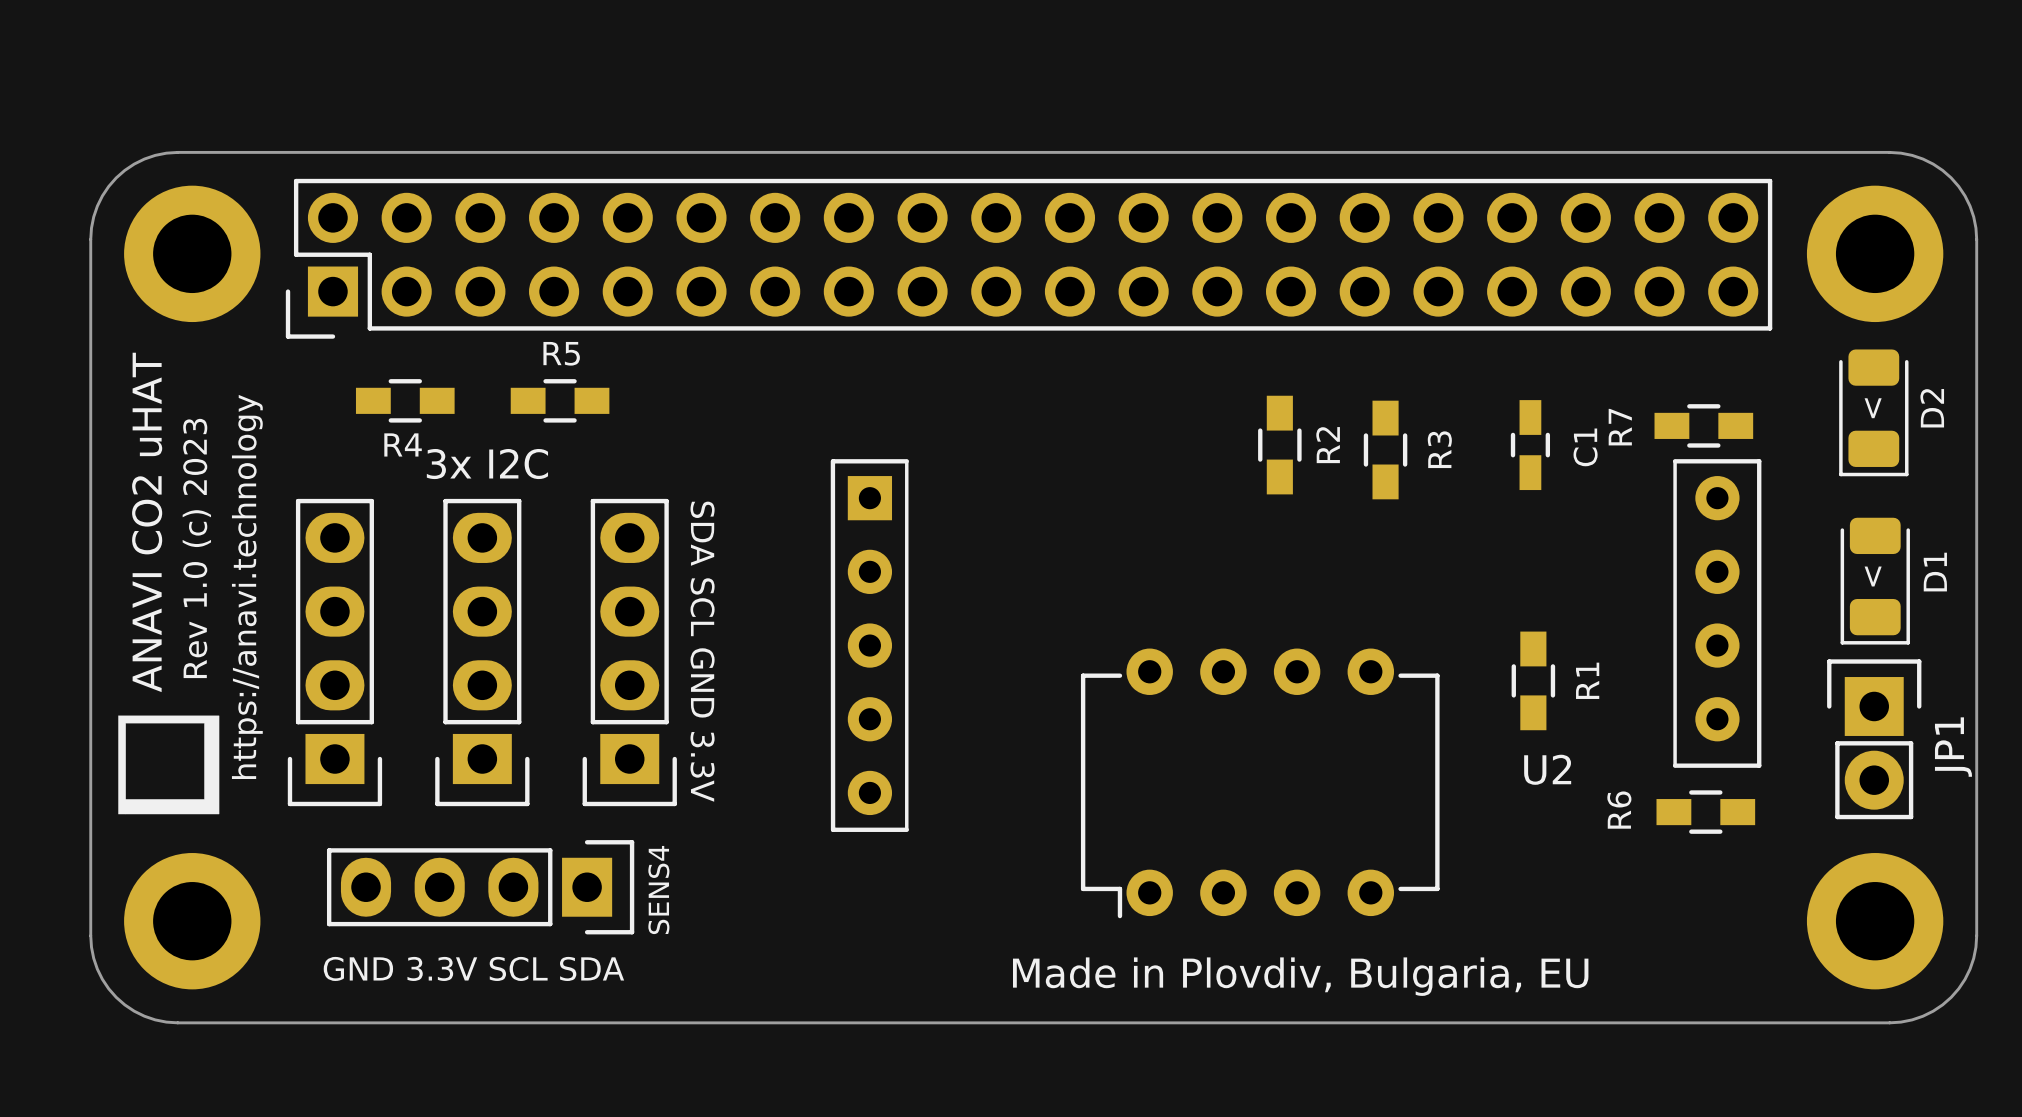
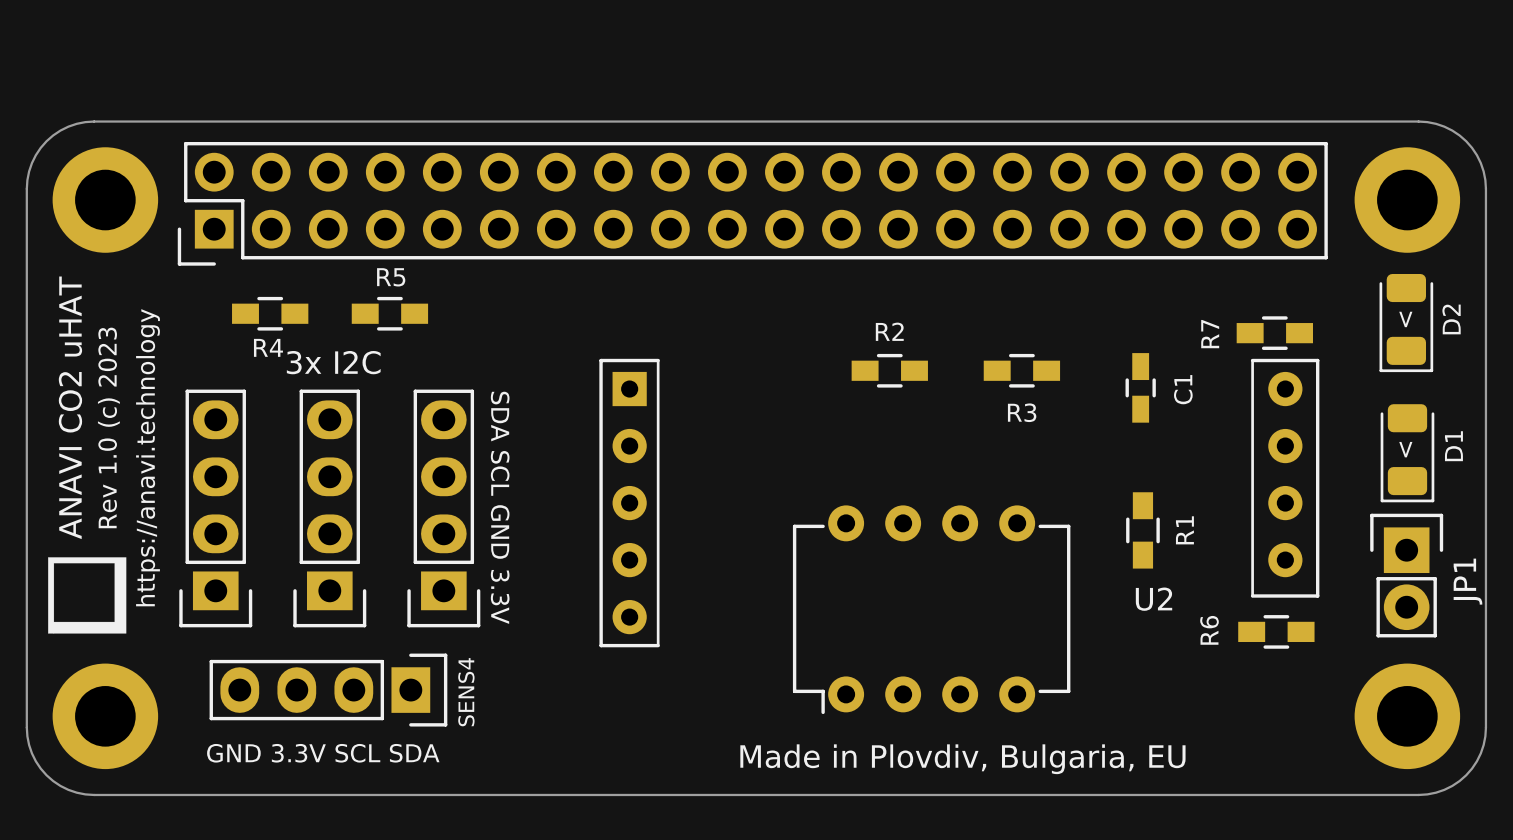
R2 rotation: 0° (1279, 445) -> 90° clockwise (889, 370)
R2 position: (1279, 445) -> (889, 370)
R2 name position: R2 (1328, 445) -> R2 (889, 331)
C1 position: (1530, 445) -> (1140, 387)
R3 rotation: 0° (1385, 450) -> 90° clockwise (1021, 370)

